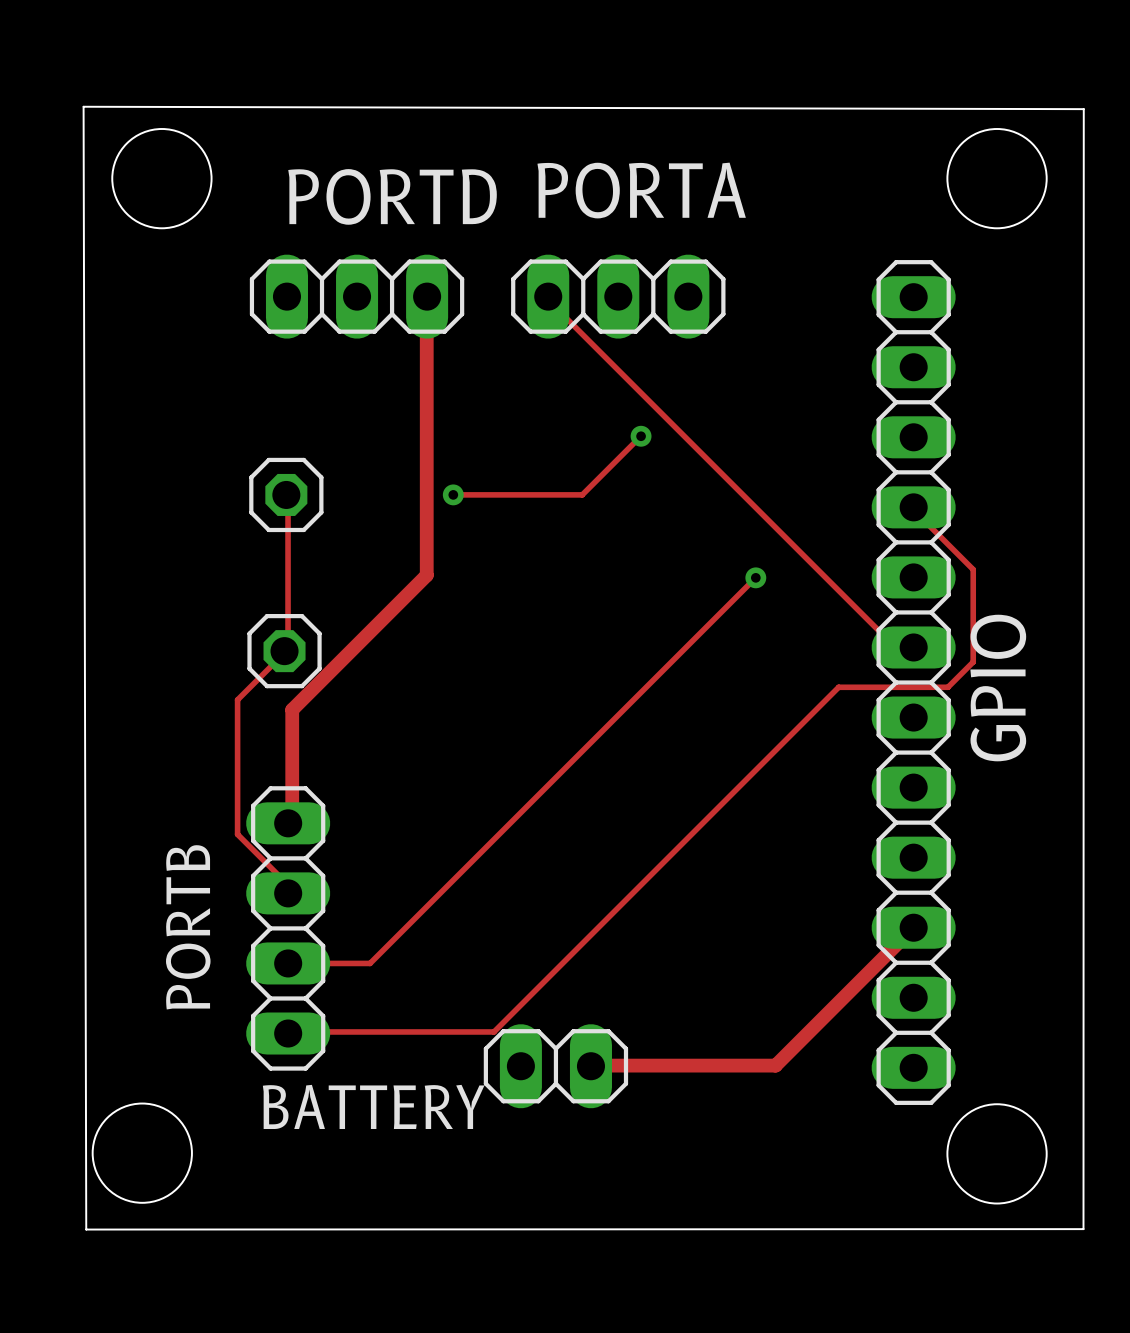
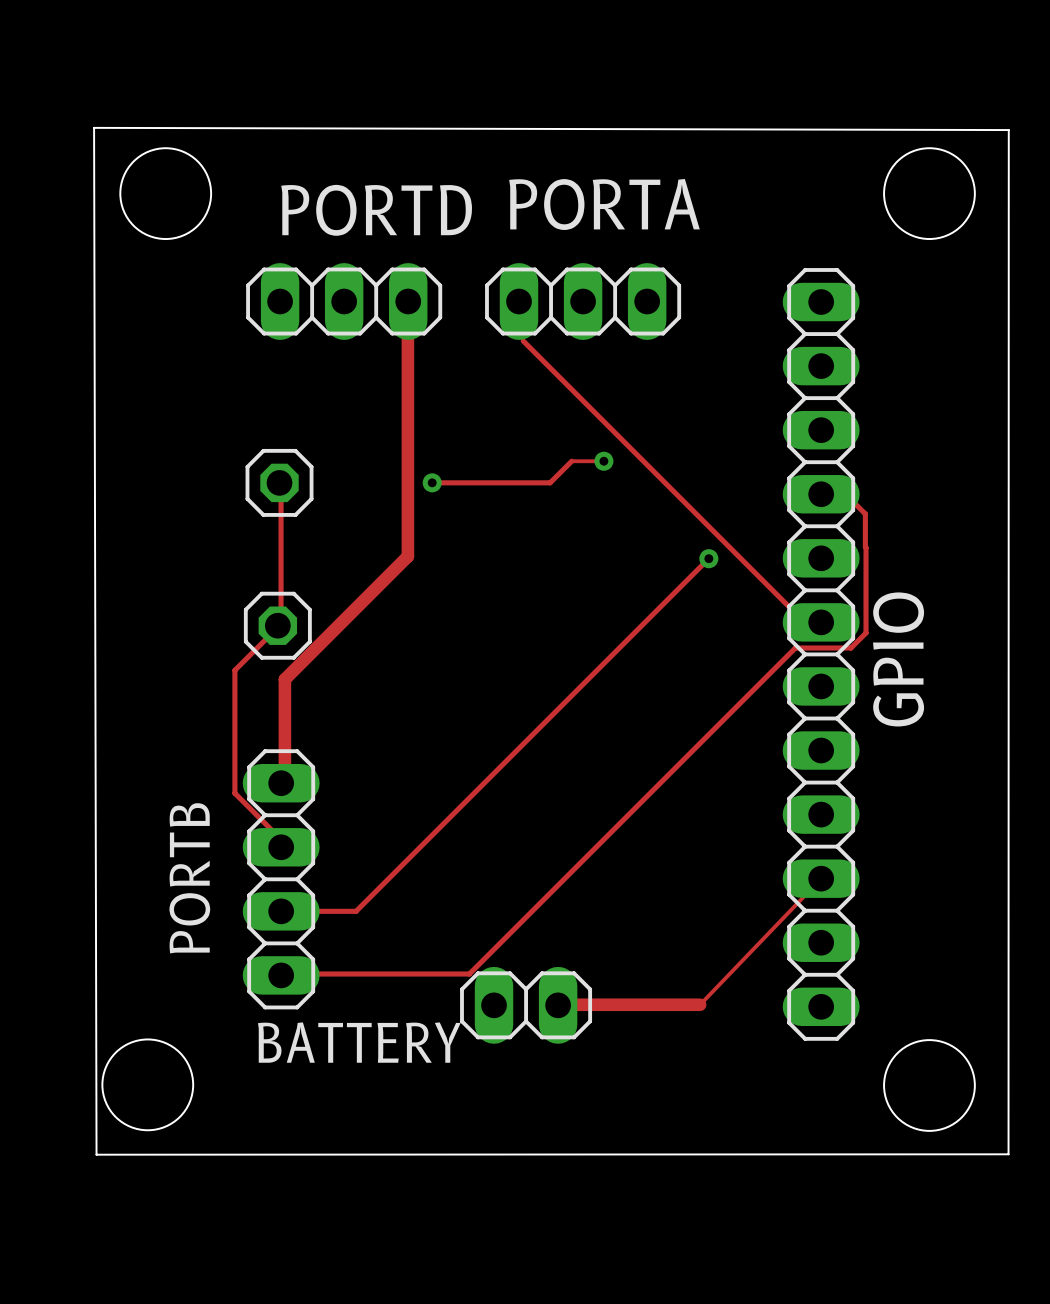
track: (548, 300) (893, 645) (910, 645) (913, 647) -> (519, 305) (523, 340) (804, 622) (821, 622)
track: (640, 436) (605, 471) -> (603, 461) (571, 461)
via position: (641, 436) -> (603, 461)
track: (913, 507) (914, 510) (973, 569) (973, 662) (948, 687) (838, 687) -> (821, 494) (845, 494) (865, 513) (866, 633) (851, 648) (795, 648) (784, 658)
part position: (913, 682) -> (821, 654)
text position: GPIO (998, 688) -> GPIO (898, 659)
track: (913, 927) (775, 1065) (746, 1065) -> (821, 878) (700, 1004)

